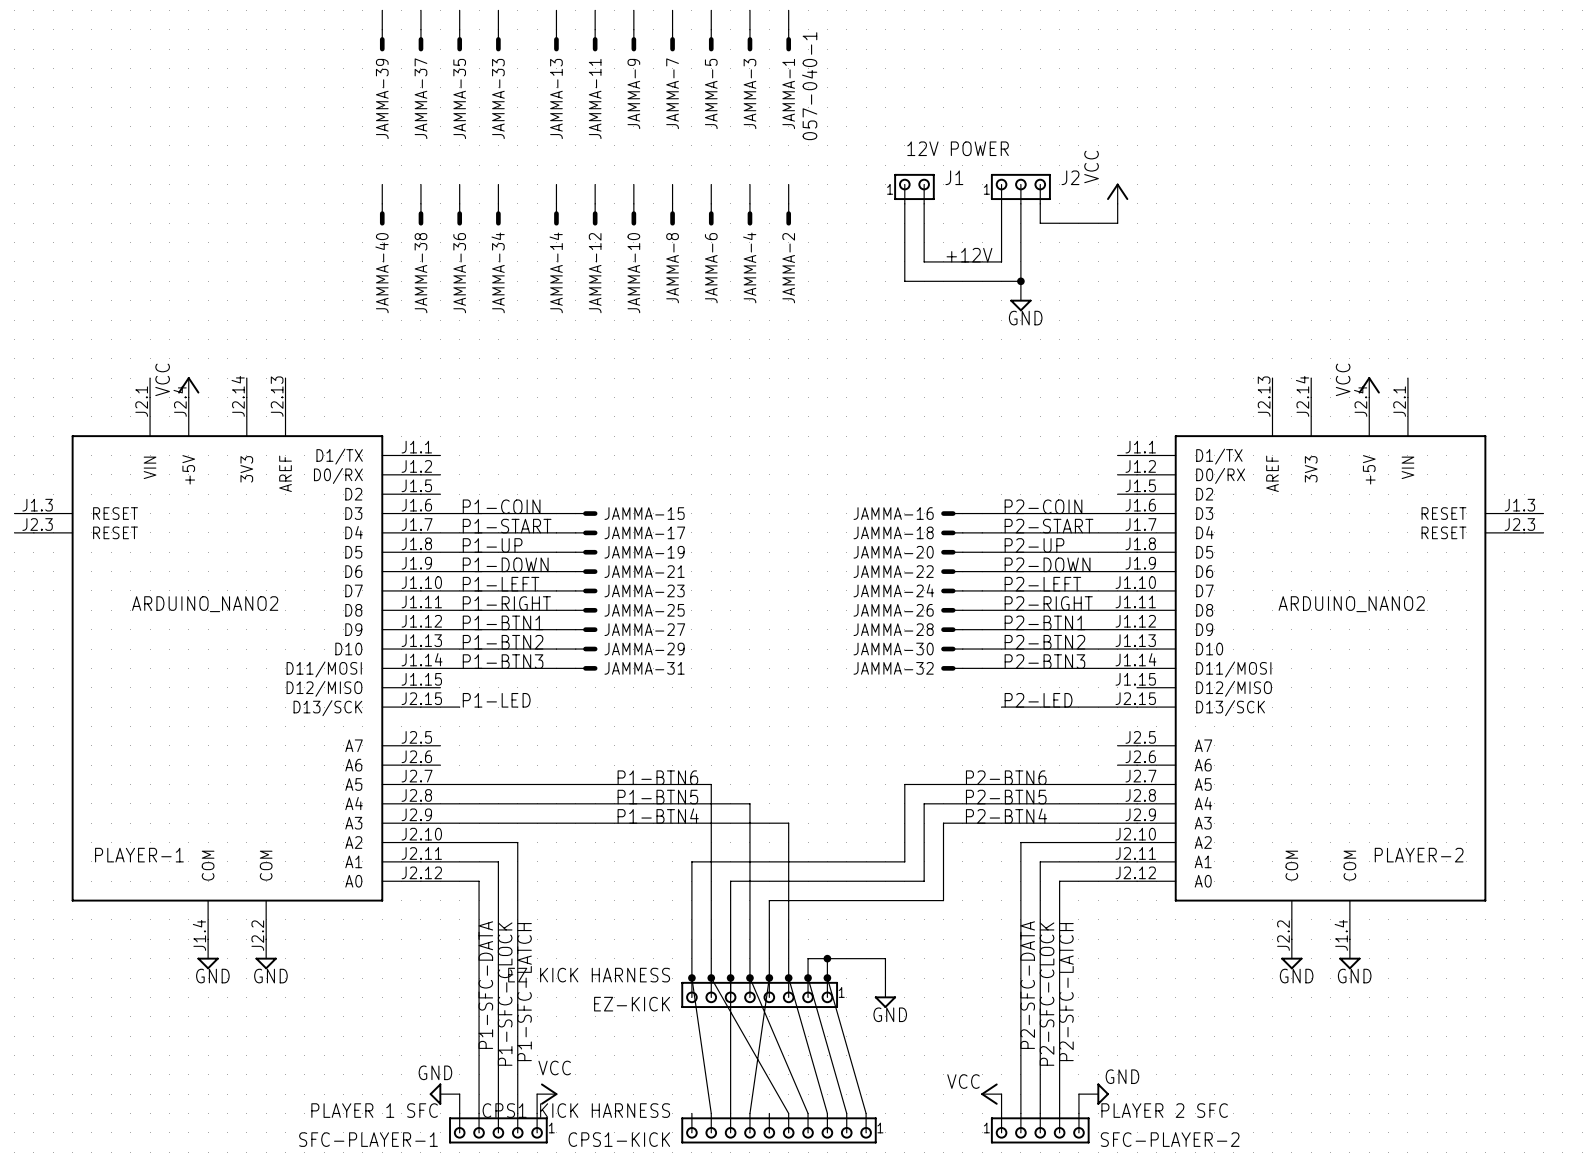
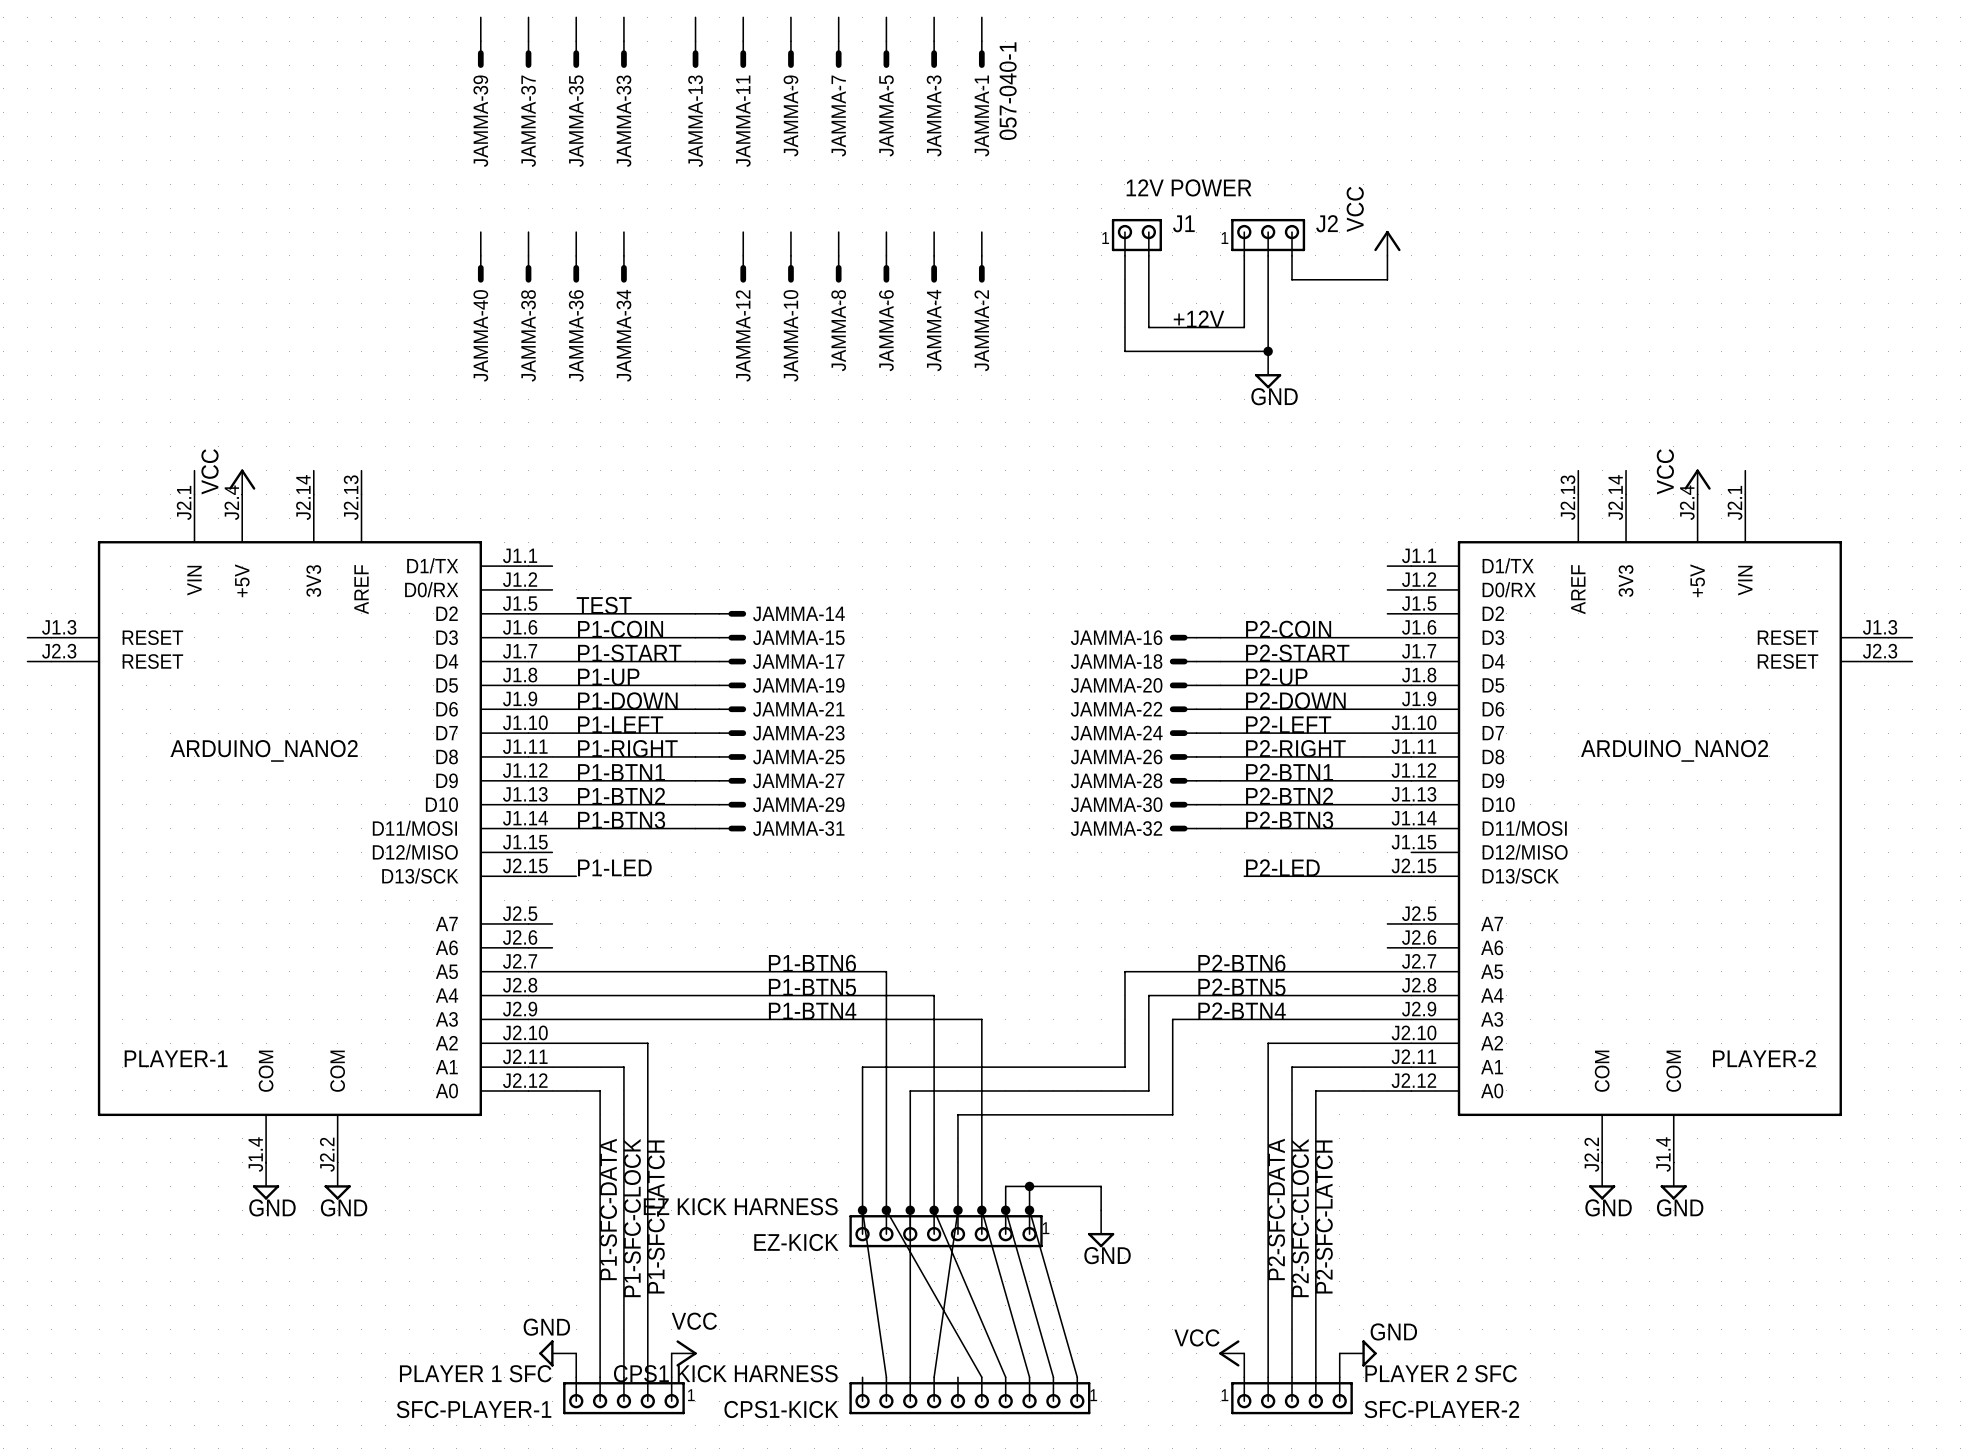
JAMMA-14 position: (556, 205) -> (720, 613)
JAMMA-14 rotation: 0° (556, 214) -> 90° counterclockwise (732, 613)
label: none -> TEST (604, 605)
wire: none -> (552, 613) (695, 613)

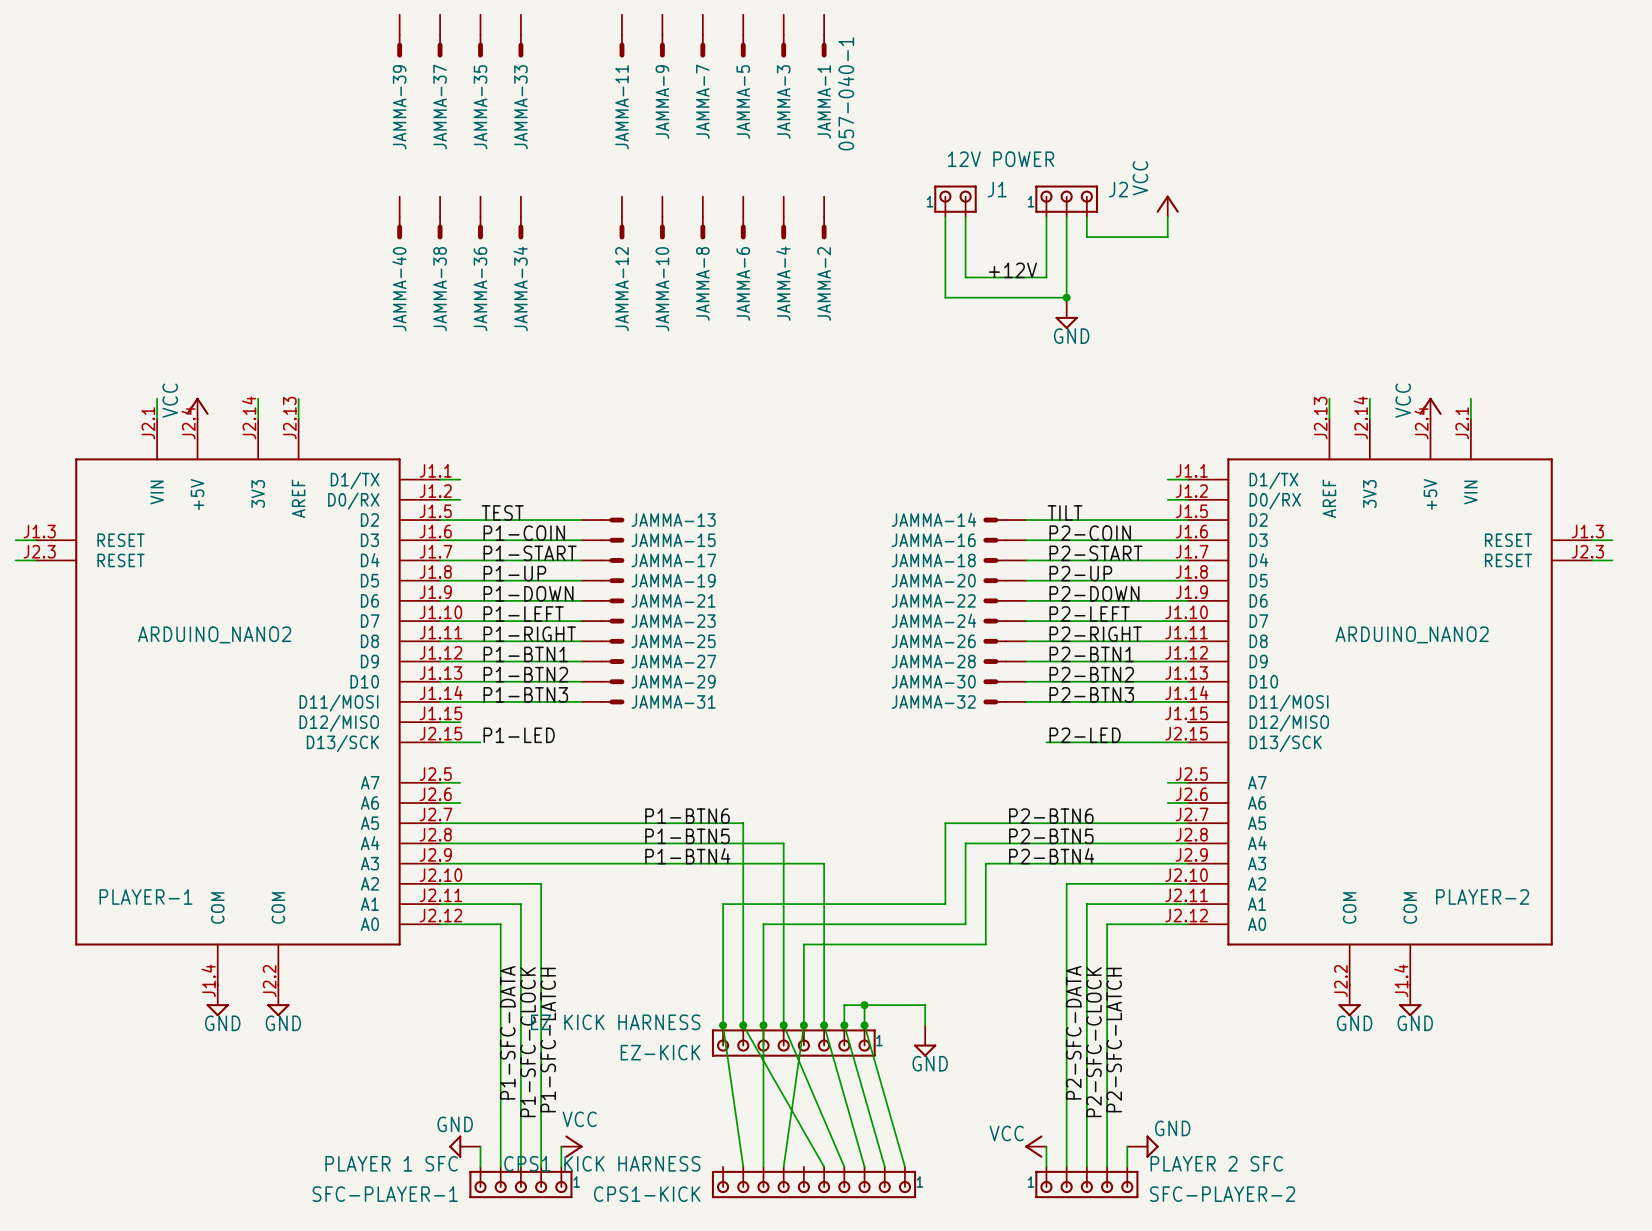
JAMMA-13: (695, 42) -> none
label: none -> TILT (1065, 512)
JAMMA-14 name: JAMMA-14 (798, 613) -> JAMMA-13 (673, 520)
JAMMA-14: none -> (1004, 520)
wire: none -> (1026, 520) (1167, 520)

